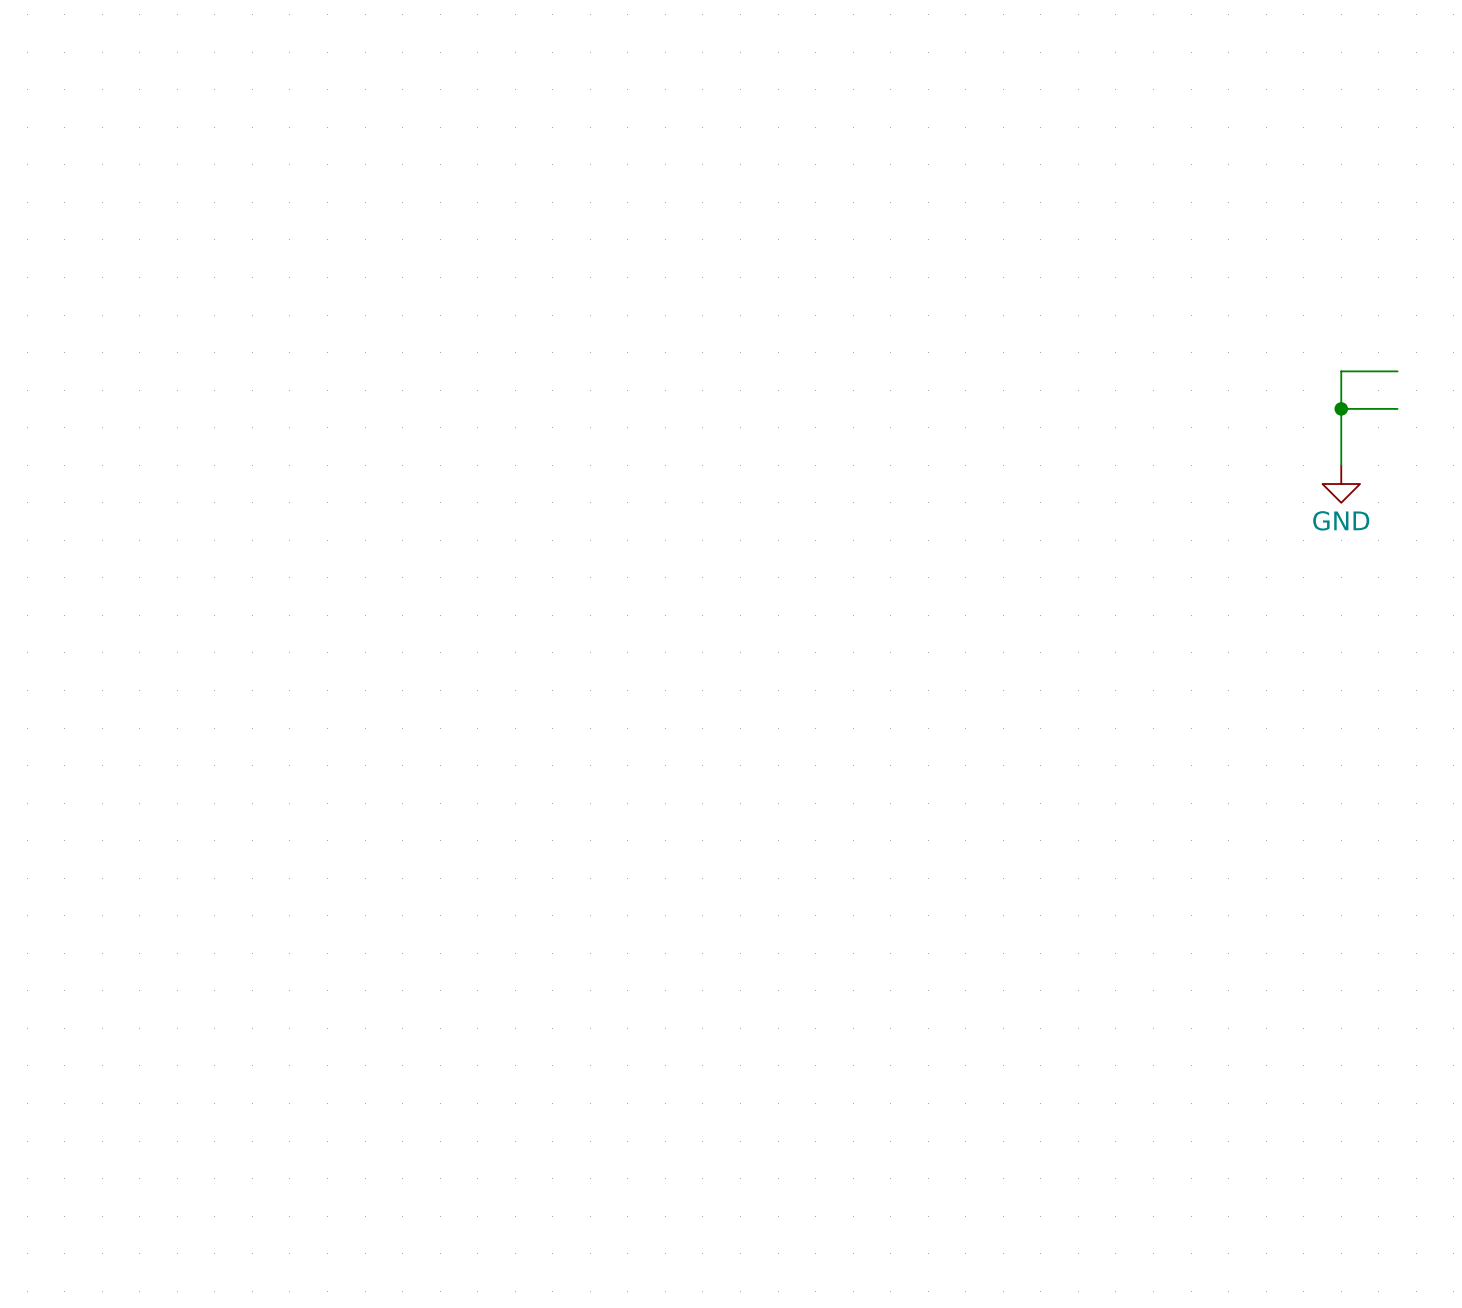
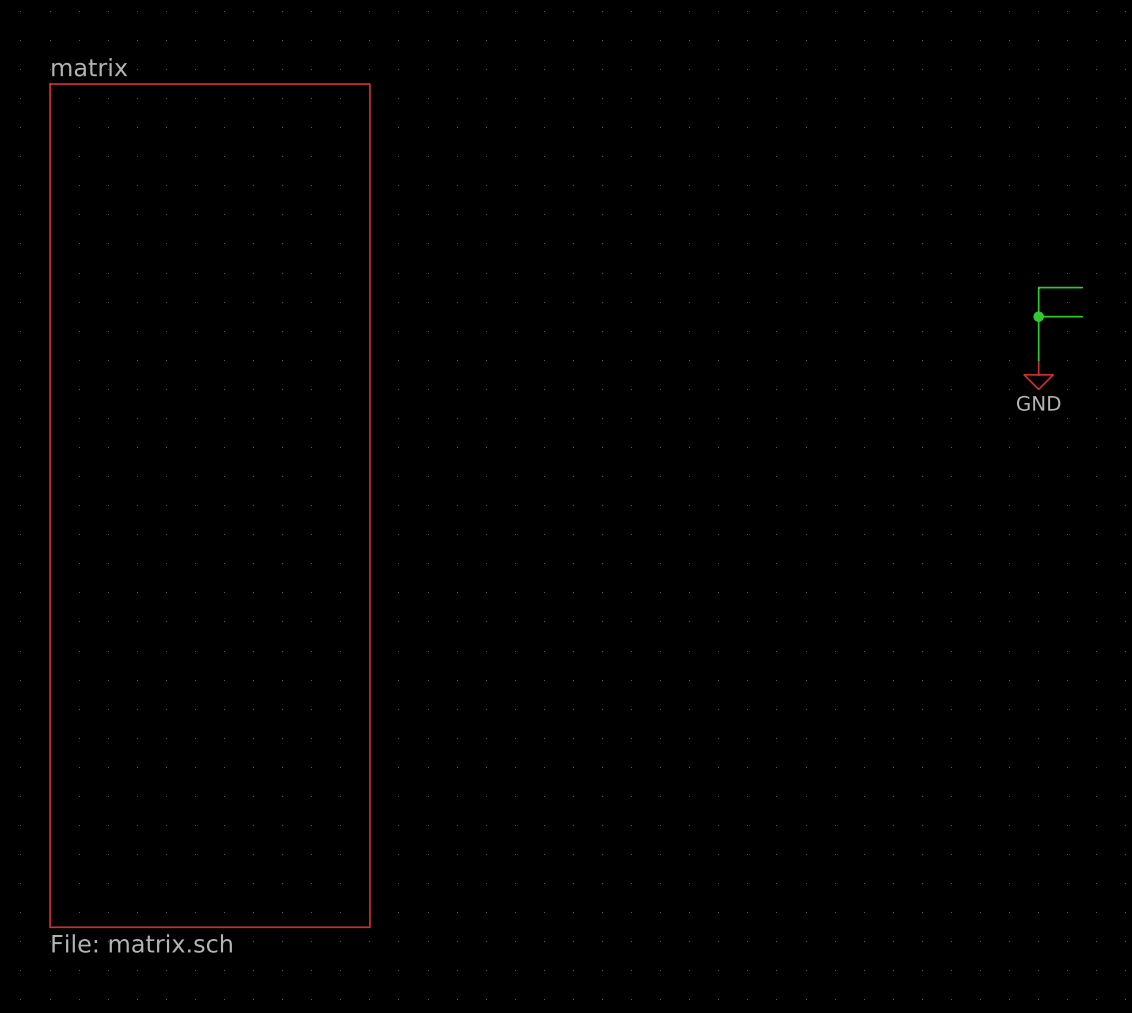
sheet matrix: none -> File: matrix.sch (209, 505)

